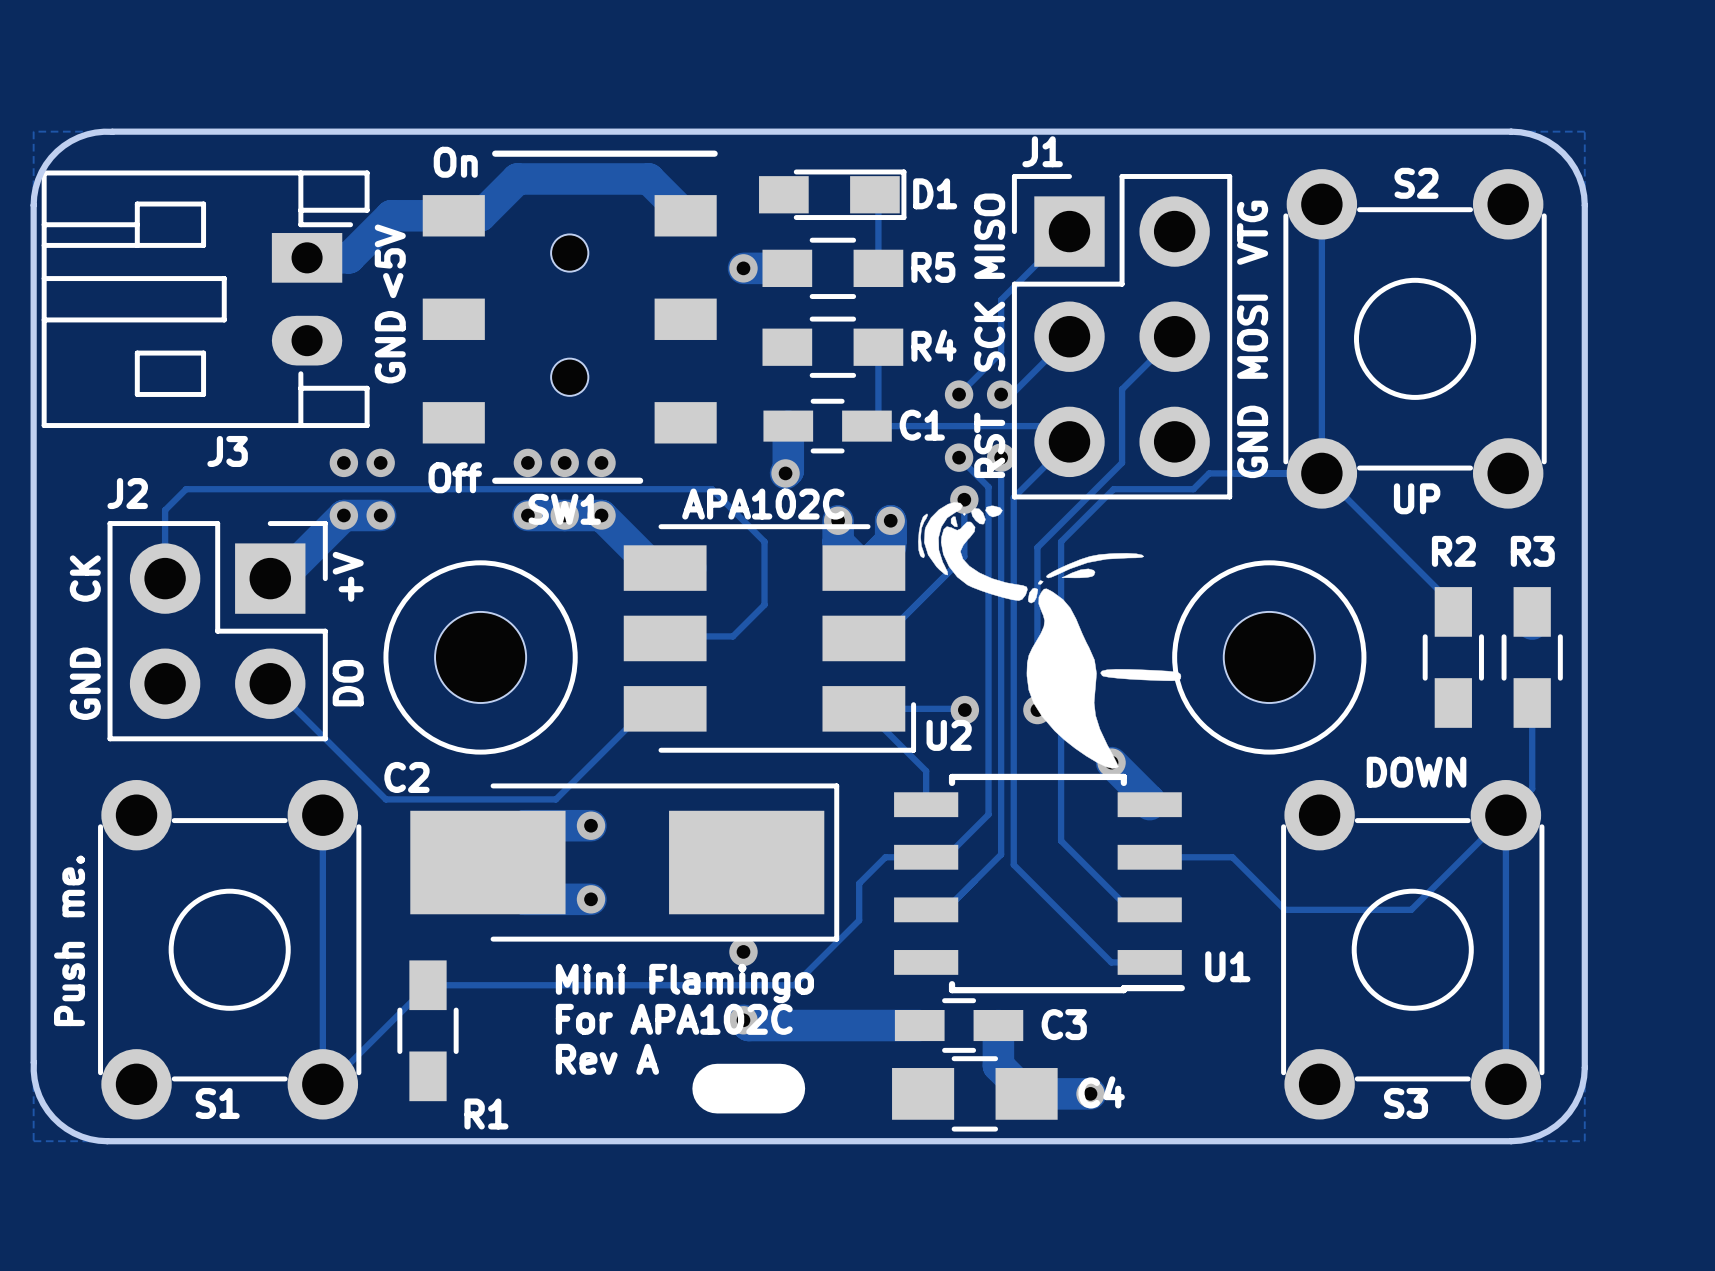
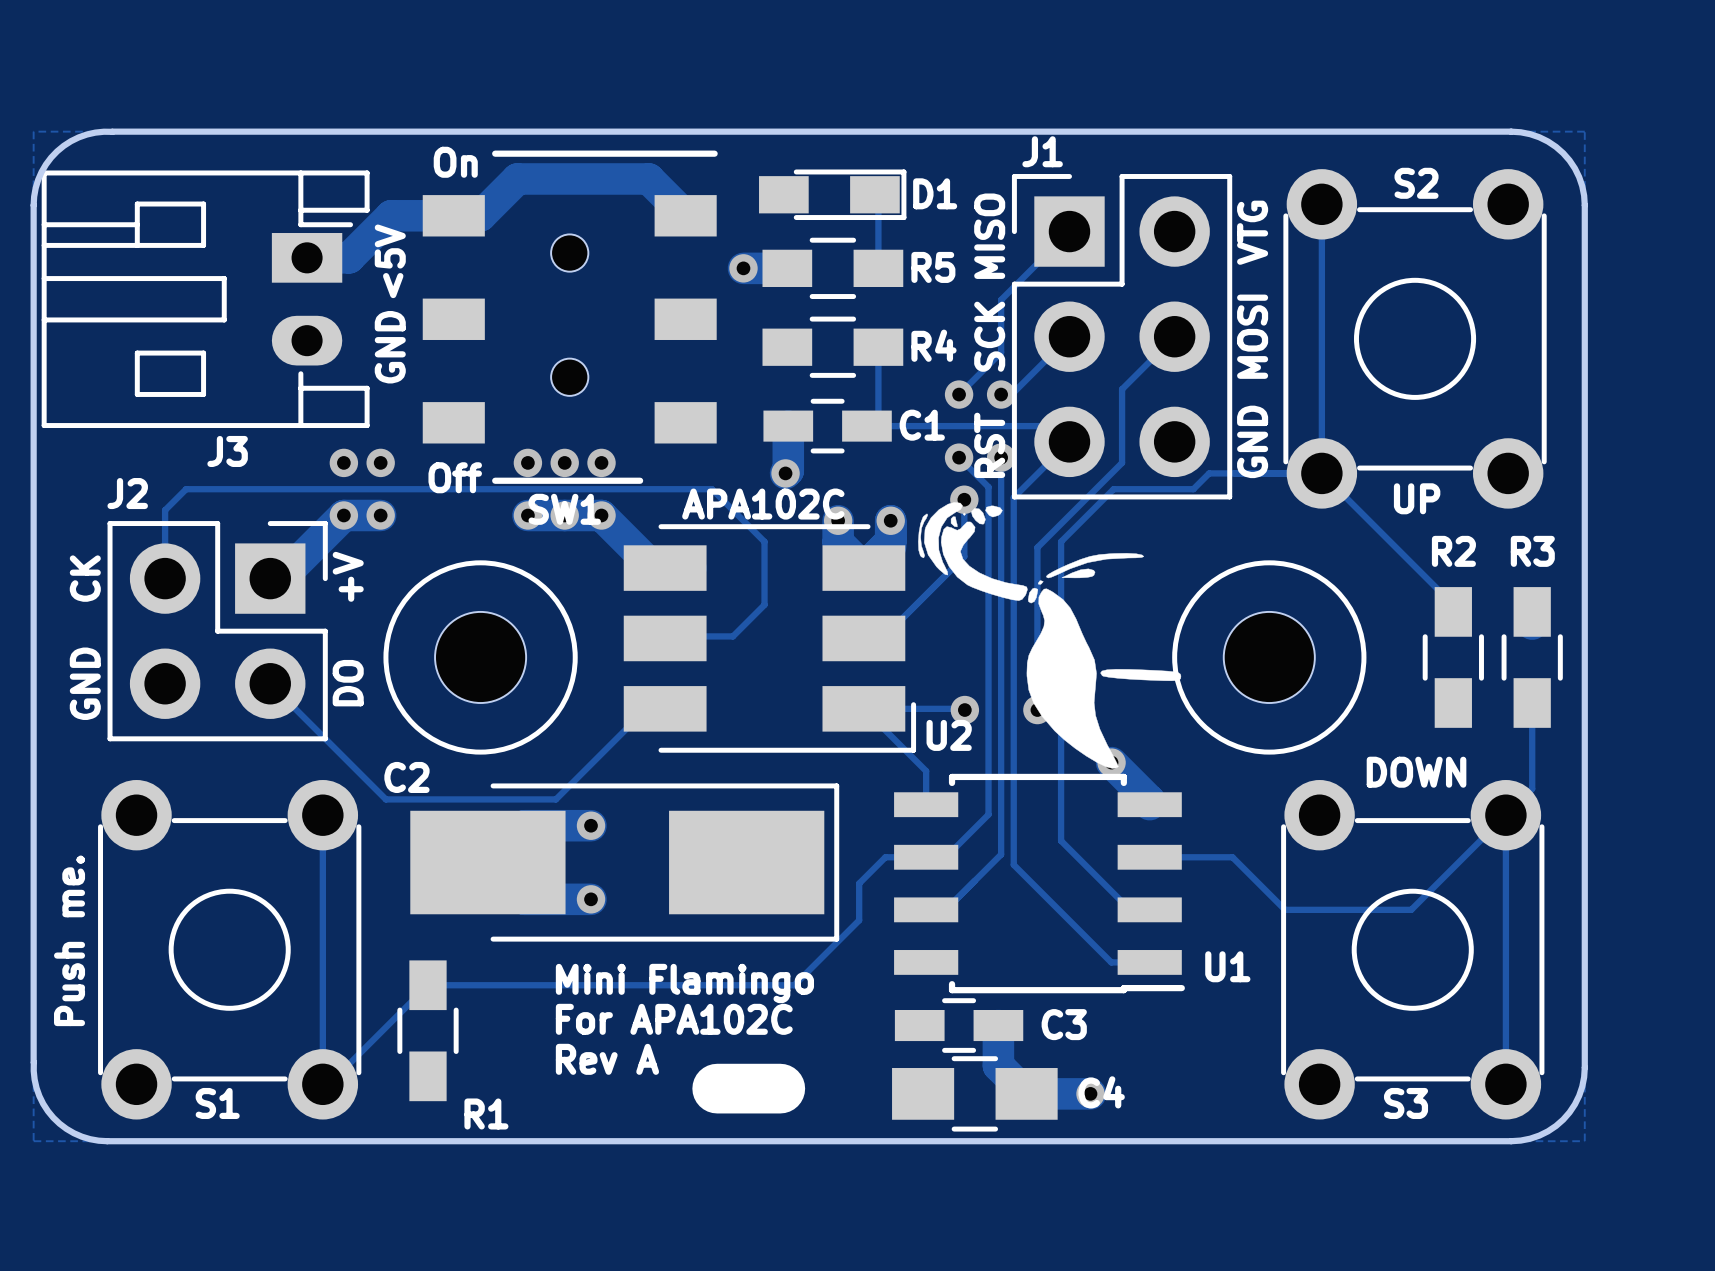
via: (743, 951) -> none
track: (743, 1020) (748, 1025) (919, 1025) -> none
via: (743, 1020) -> none

